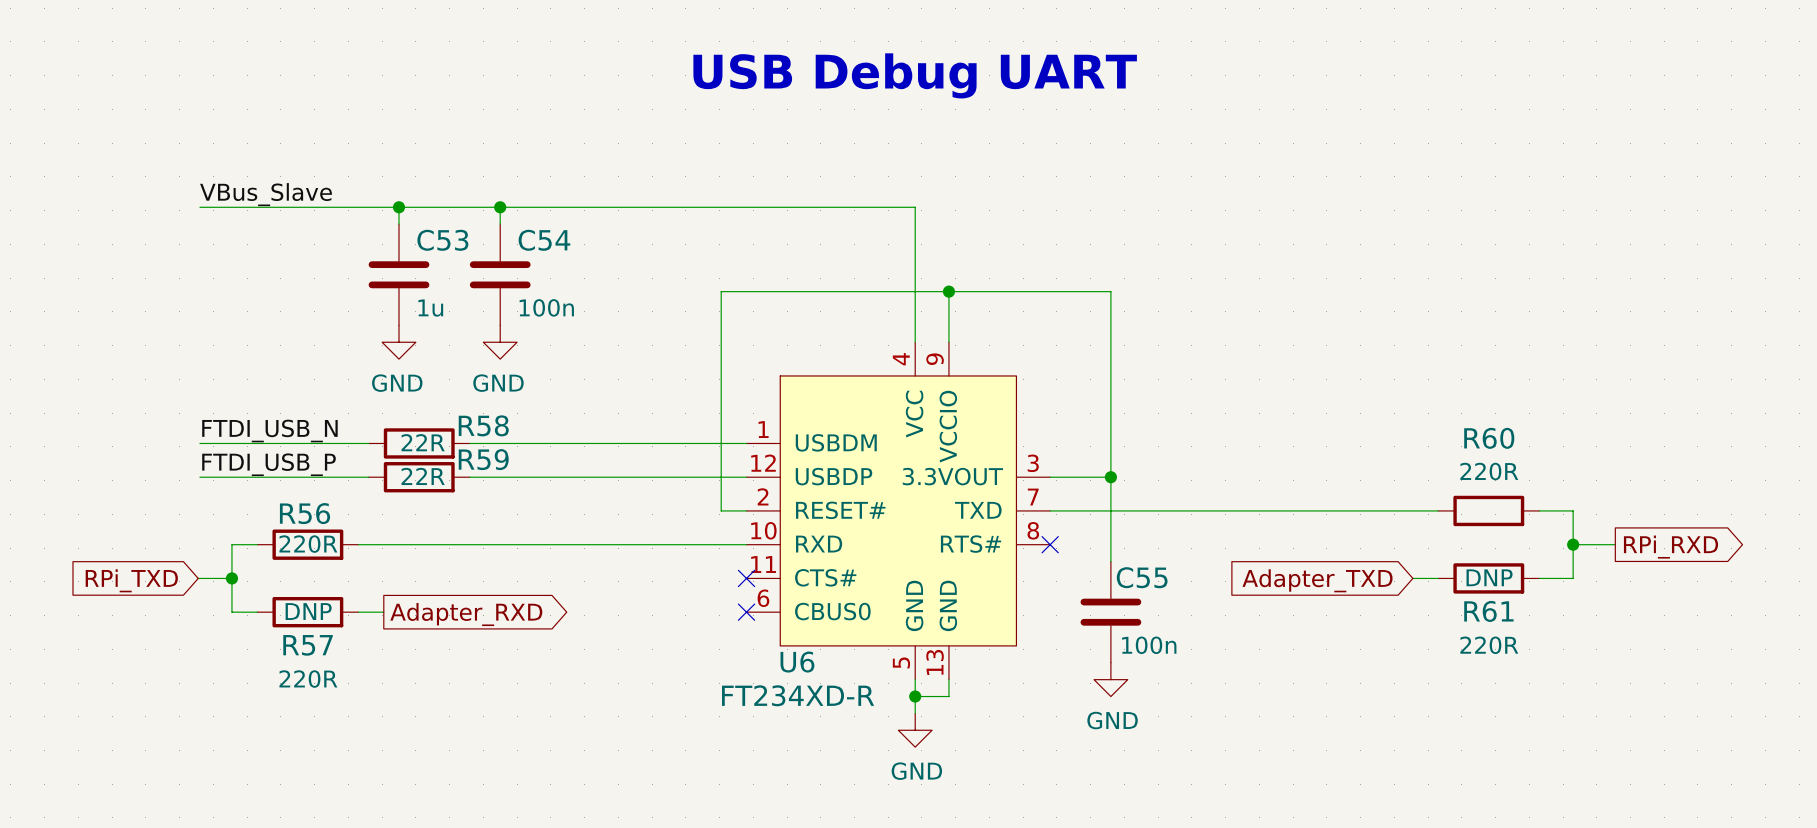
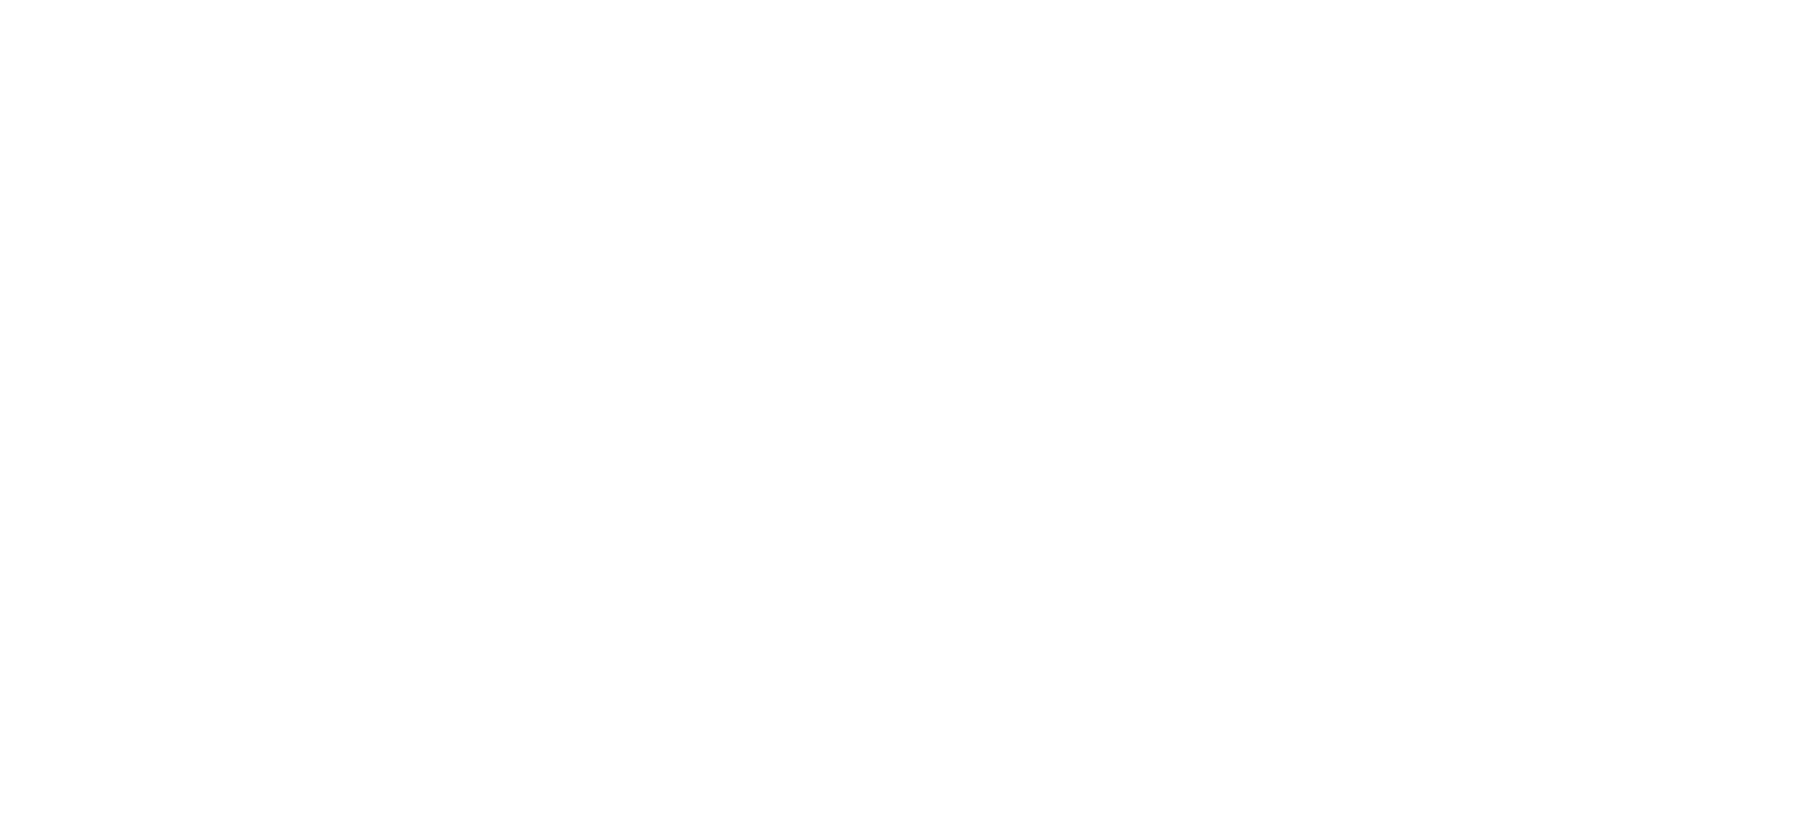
text: USB Debug UART (915, 75) -> none
label: VBus_Slave (266, 194) -> none
wire: (199, 207) (915, 207) (915, 342) -> none
wire: (398, 207) (398, 224) -> none
junction: (398, 207) -> none
wire: (500, 207) (500, 224) -> none
junction: (500, 207) -> none
C53: (398, 274) -> none
C54: (500, 274) -> none
wire: (948, 291) (948, 342) -> none
junction: (948, 291) -> none
power symbol: GND (398, 342) -> none
power symbol: GND (500, 342) -> none
label: FTDI_USB_N (269, 430) -> none
wire: (199, 443) (368, 443) -> none
R58: (419, 443) -> none
wire: (469, 443) (746, 443) -> none
label: FTDI_USB_P (269, 464) -> none
wire: (199, 477) (368, 477) -> none
R59: (419, 477) -> none
wire: (469, 477) (746, 477) -> none
wire: (1050, 477) (1110, 477) -> none
junction: (1110, 477) -> none
wire: (746, 510) (721, 510) (721, 291) (1110, 291) (1110, 561) -> none
U6: FT234XD-R (898, 510) -> none
wire: (1050, 510) (1438, 510) -> none
R60: (1488, 510) -> none
wire: (1539, 510) (1573, 510) (1573, 578) (1539, 578) -> none
wire: (257, 544) (231, 544) (231, 612) (257, 612) -> none
R56: (307, 544) -> none
wire: (358, 544) (746, 544) -> none
no-connect mark: (1050, 544) -> none
wire: (1573, 544) (1615, 544) -> none
junction: (1573, 544) -> none
global label: RPi_RXD (1671, 547) -> none
wire: (198, 578) (231, 578) -> none
junction: (231, 578) -> none
no-connect mark: (746, 578) -> none
wire: (1412, 578) (1438, 578) -> none
R61: (1488, 578) -> none
global label: RPi_TXD (131, 580) -> none
global label: Adapter_TXD (1317, 580) -> none
R57: (307, 612) -> none
wire: (358, 612) (383, 612) -> none
no-connect mark: (746, 612) -> none
C55: (1110, 612) -> none
global label: Adapter_RXD (466, 614) -> none
wire: (915, 679) (915, 713) -> none
wire: (948, 679) (948, 696) (915, 696) -> none
power symbol: GND (1110, 679) -> none
junction: (915, 696) -> none
power symbol: GND (915, 730) -> none

